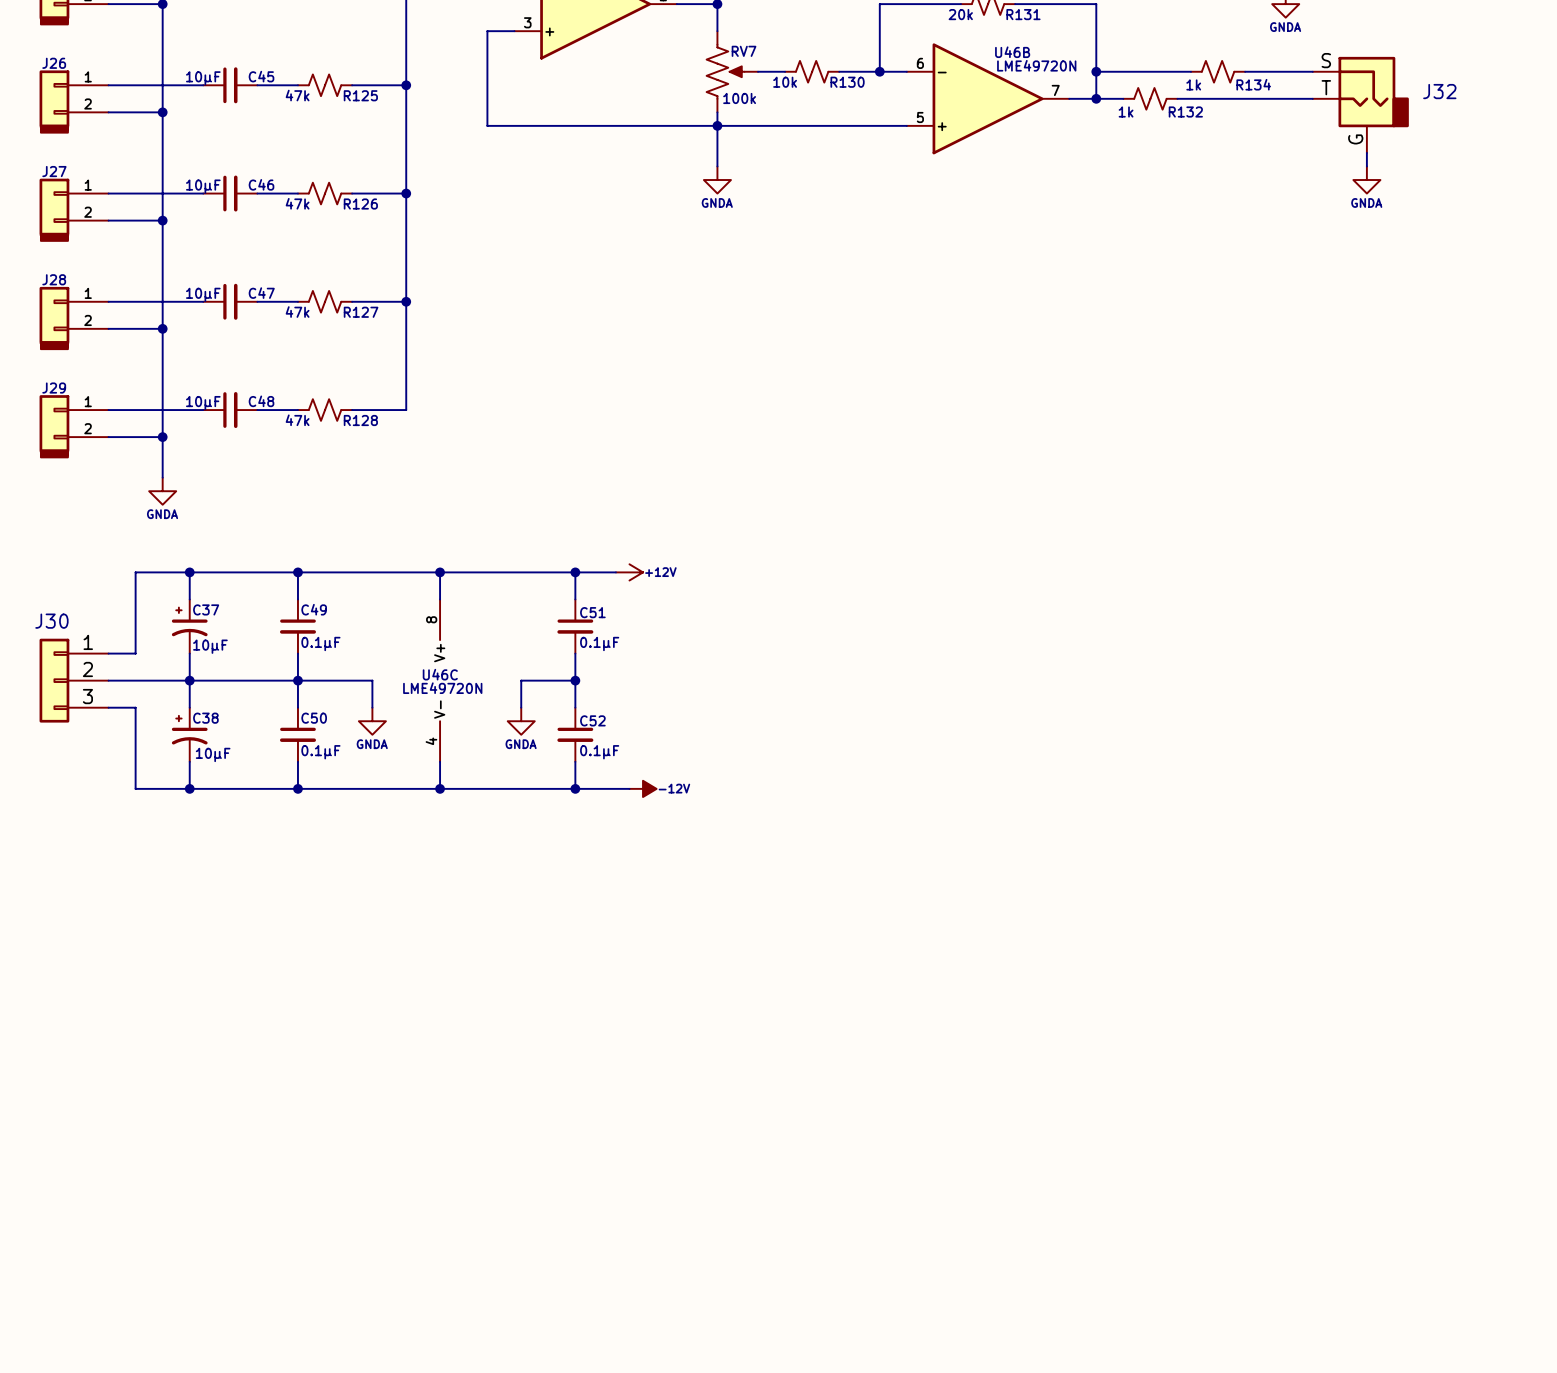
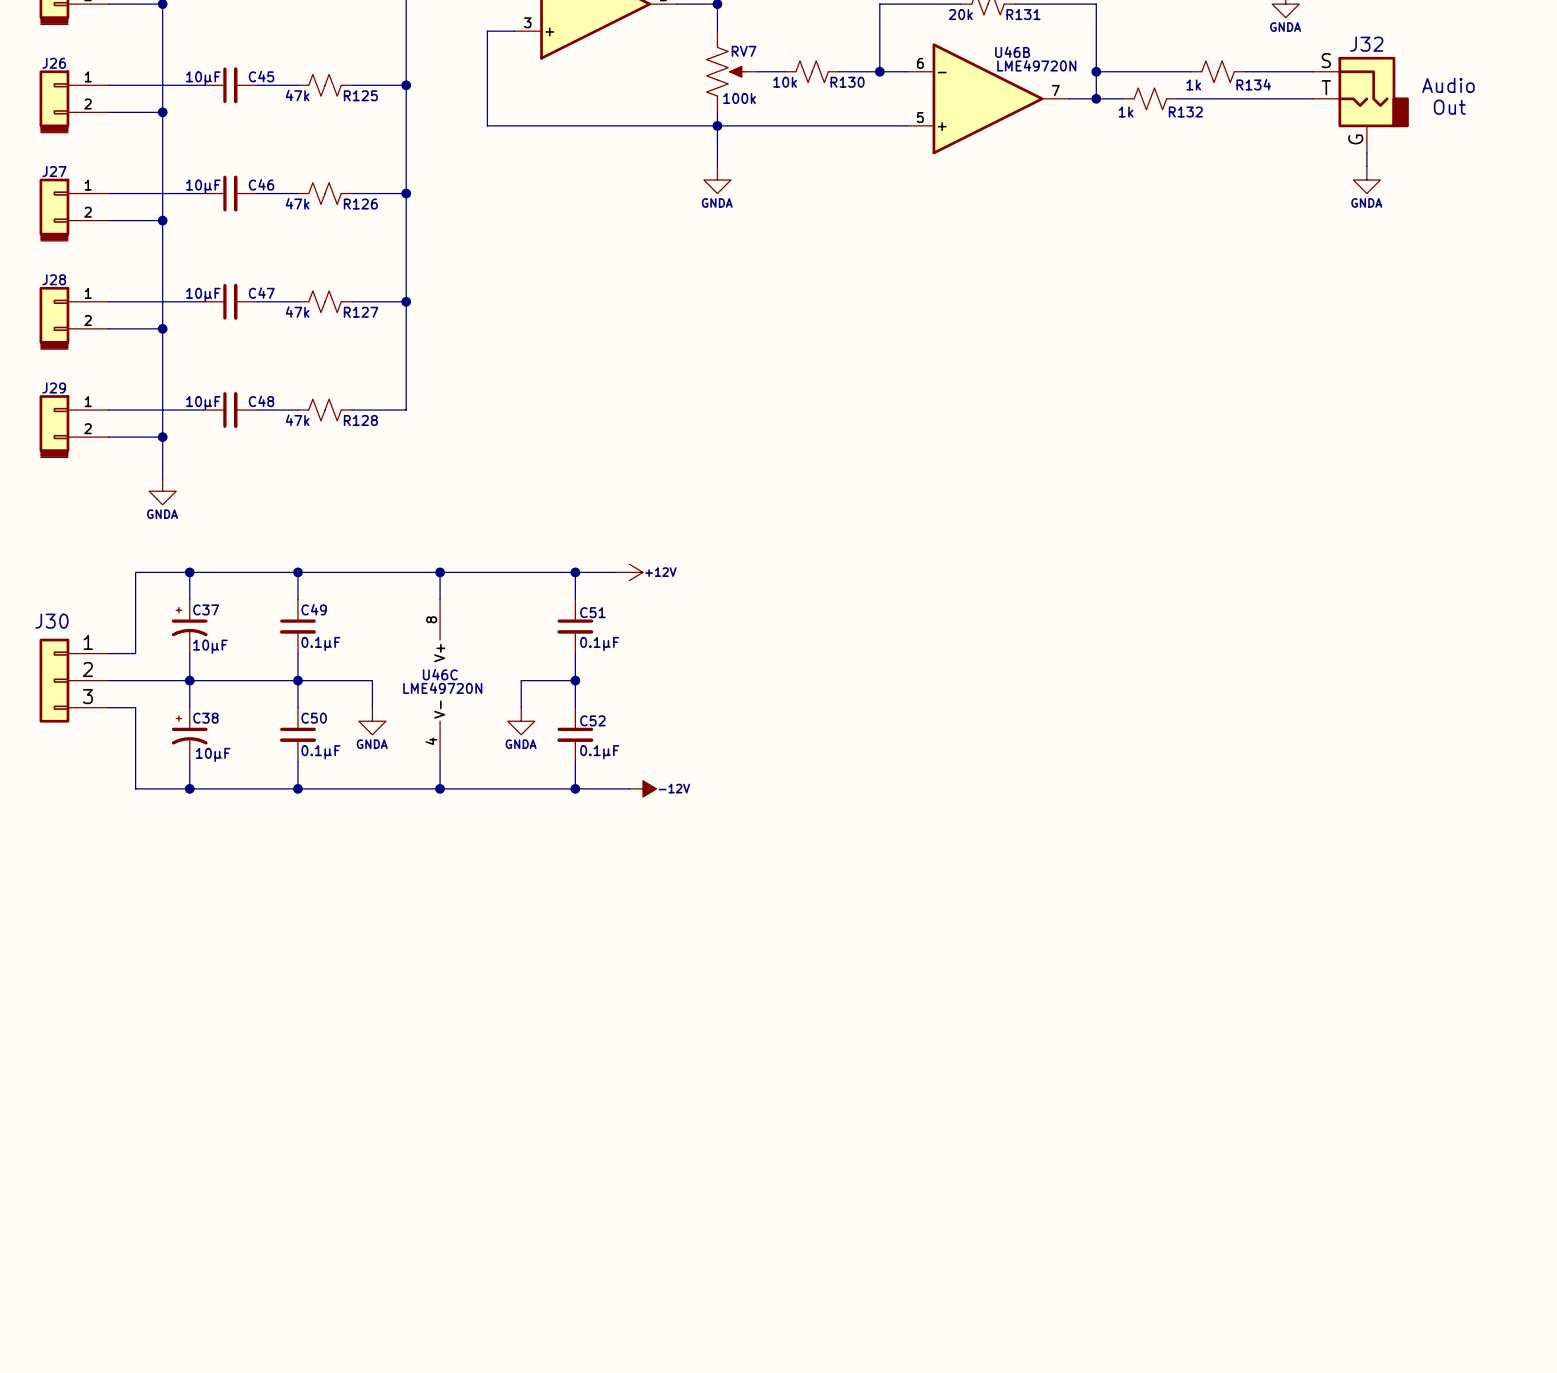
text: none -> Audio (1448, 85)
J32 name position: J32 (1439, 91) -> J32 (1366, 44)
text: none -> Out (1449, 107)

